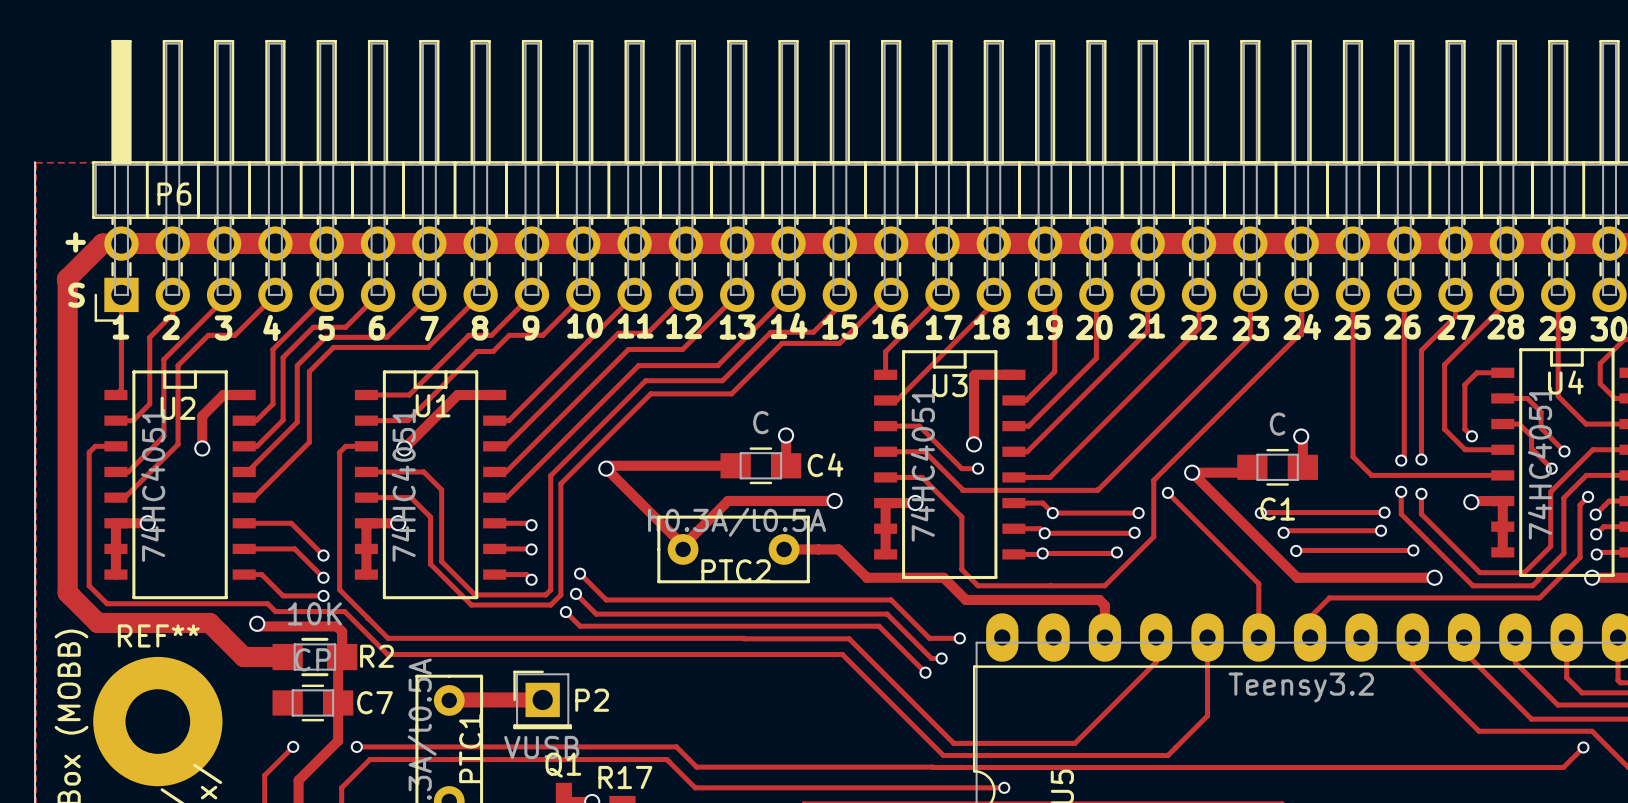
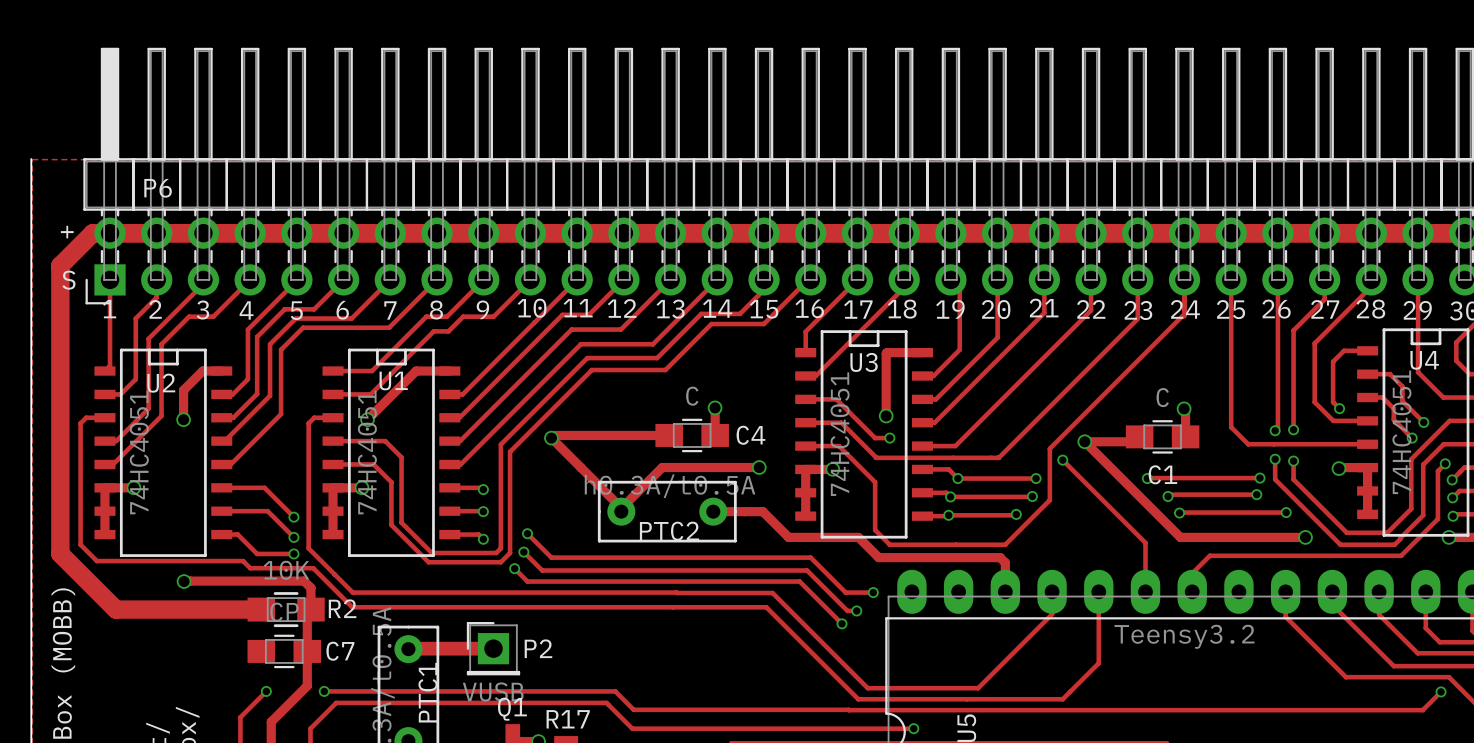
track: (67, 278) (67, 592) (97, 622) (209, 622) (243, 657) -> (60, 266) (60, 553) (116, 609) (221, 609)
track: (257, 623) (259, 626) (336, 626) (342, 633) -> (184, 581) (304, 581) (310, 587)
via position: (257, 623) -> (184, 581)
REF**: (157, 721) -> none

